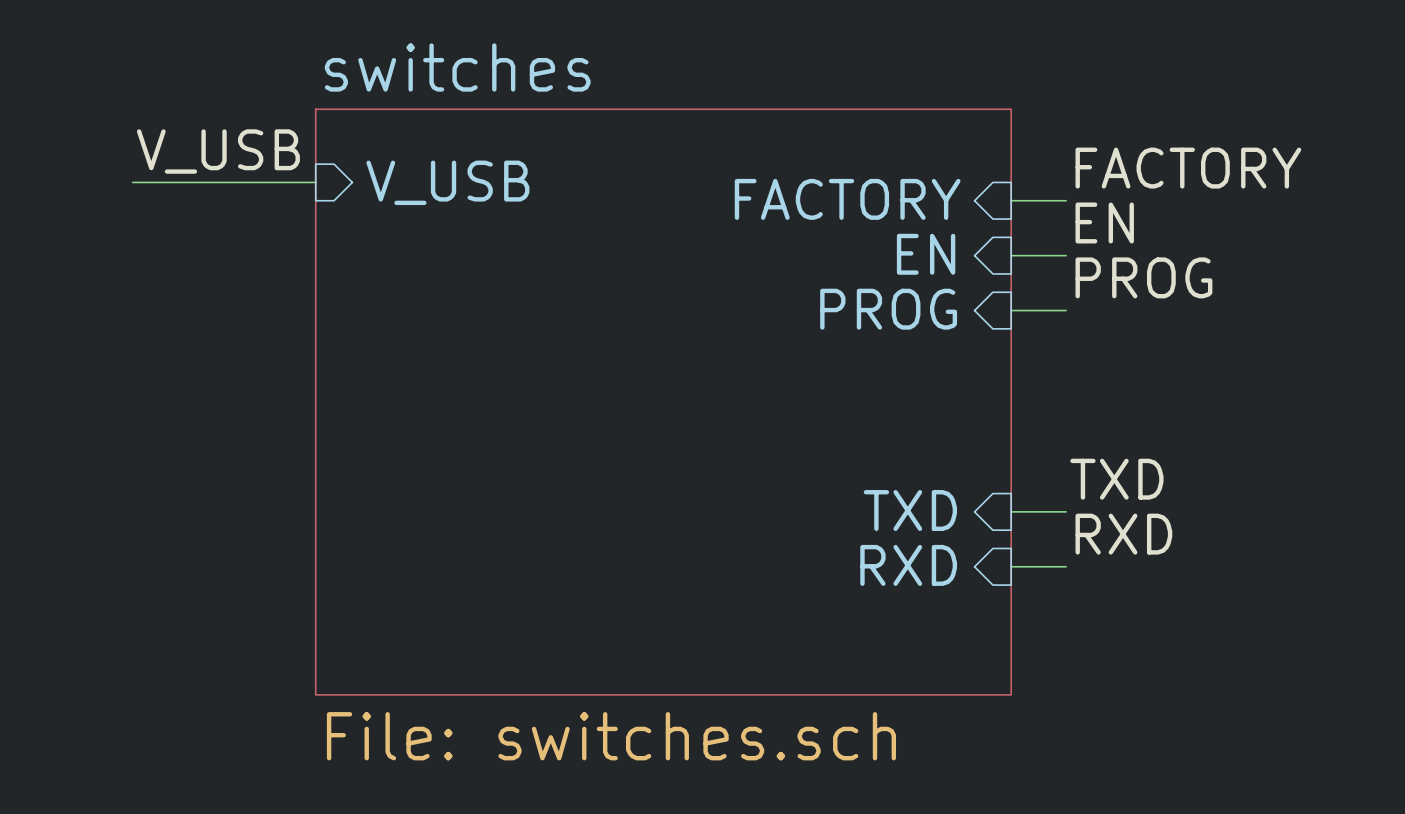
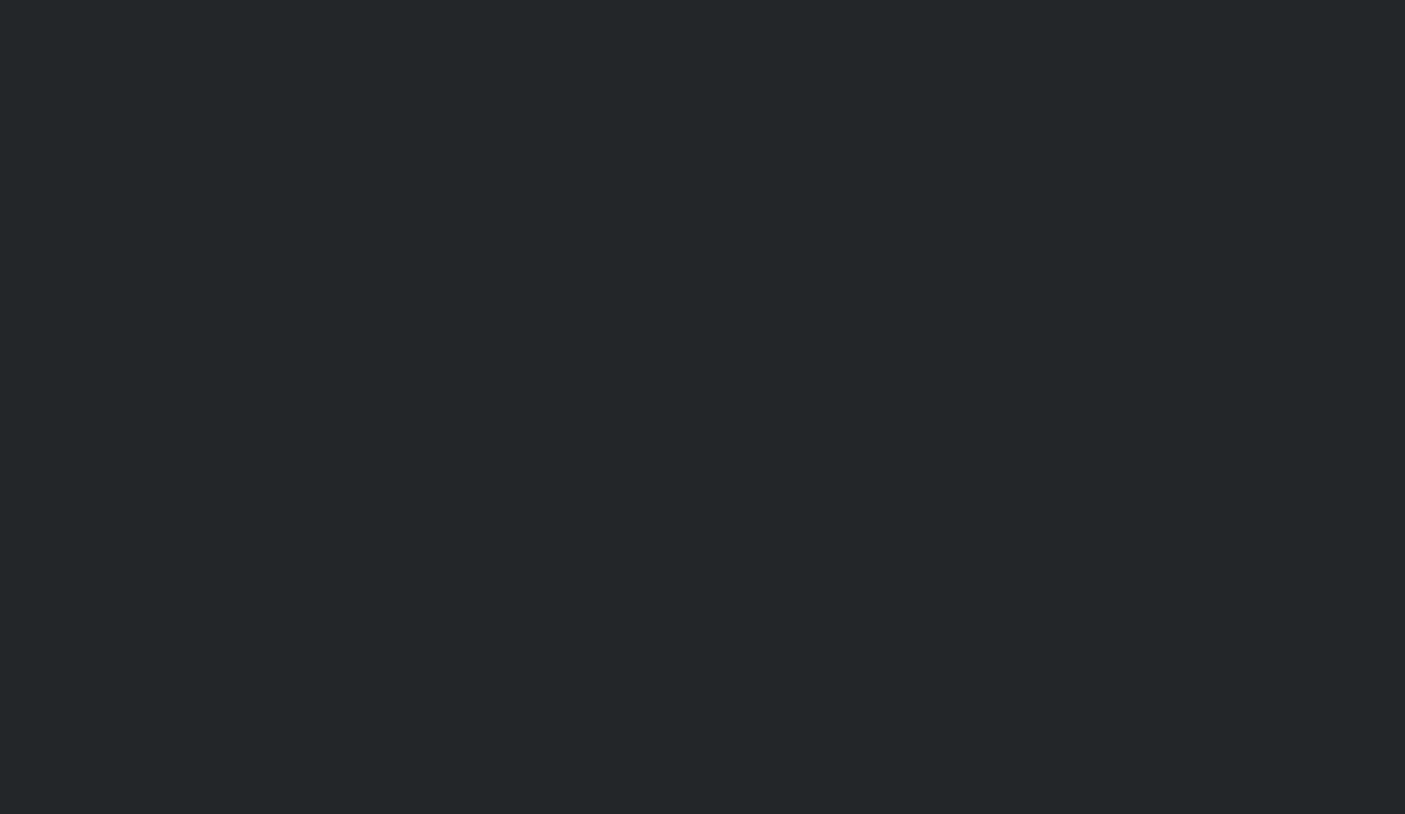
label: V_USB (218, 151) -> none
label: FACTORY (1188, 168) -> none
wire: (132, 182) (315, 182) -> none
sheet pin: V_USB (447, 182) -> none
sheet pin: FACTORY (847, 199) -> none
wire: (1011, 200) (1066, 200) -> none
label: EN (1104, 222) -> none
sheet pin: EN (926, 254) -> none
wire: (1011, 255) (1066, 255) -> none
label: PROG (1143, 277) -> none
sheet pin: PROG (888, 309) -> none
wire: (1011, 310) (1066, 310) -> none
sheet switches: File: switches.sch (663, 402) -> none
label: TXD (1116, 479) -> none
sheet pin: TXD (910, 510) -> none
wire: (1011, 511) (1066, 511) -> none
label: RXD (1123, 534) -> none
sheet pin: RXD (908, 565) -> none
wire: (1011, 566) (1066, 566) -> none

